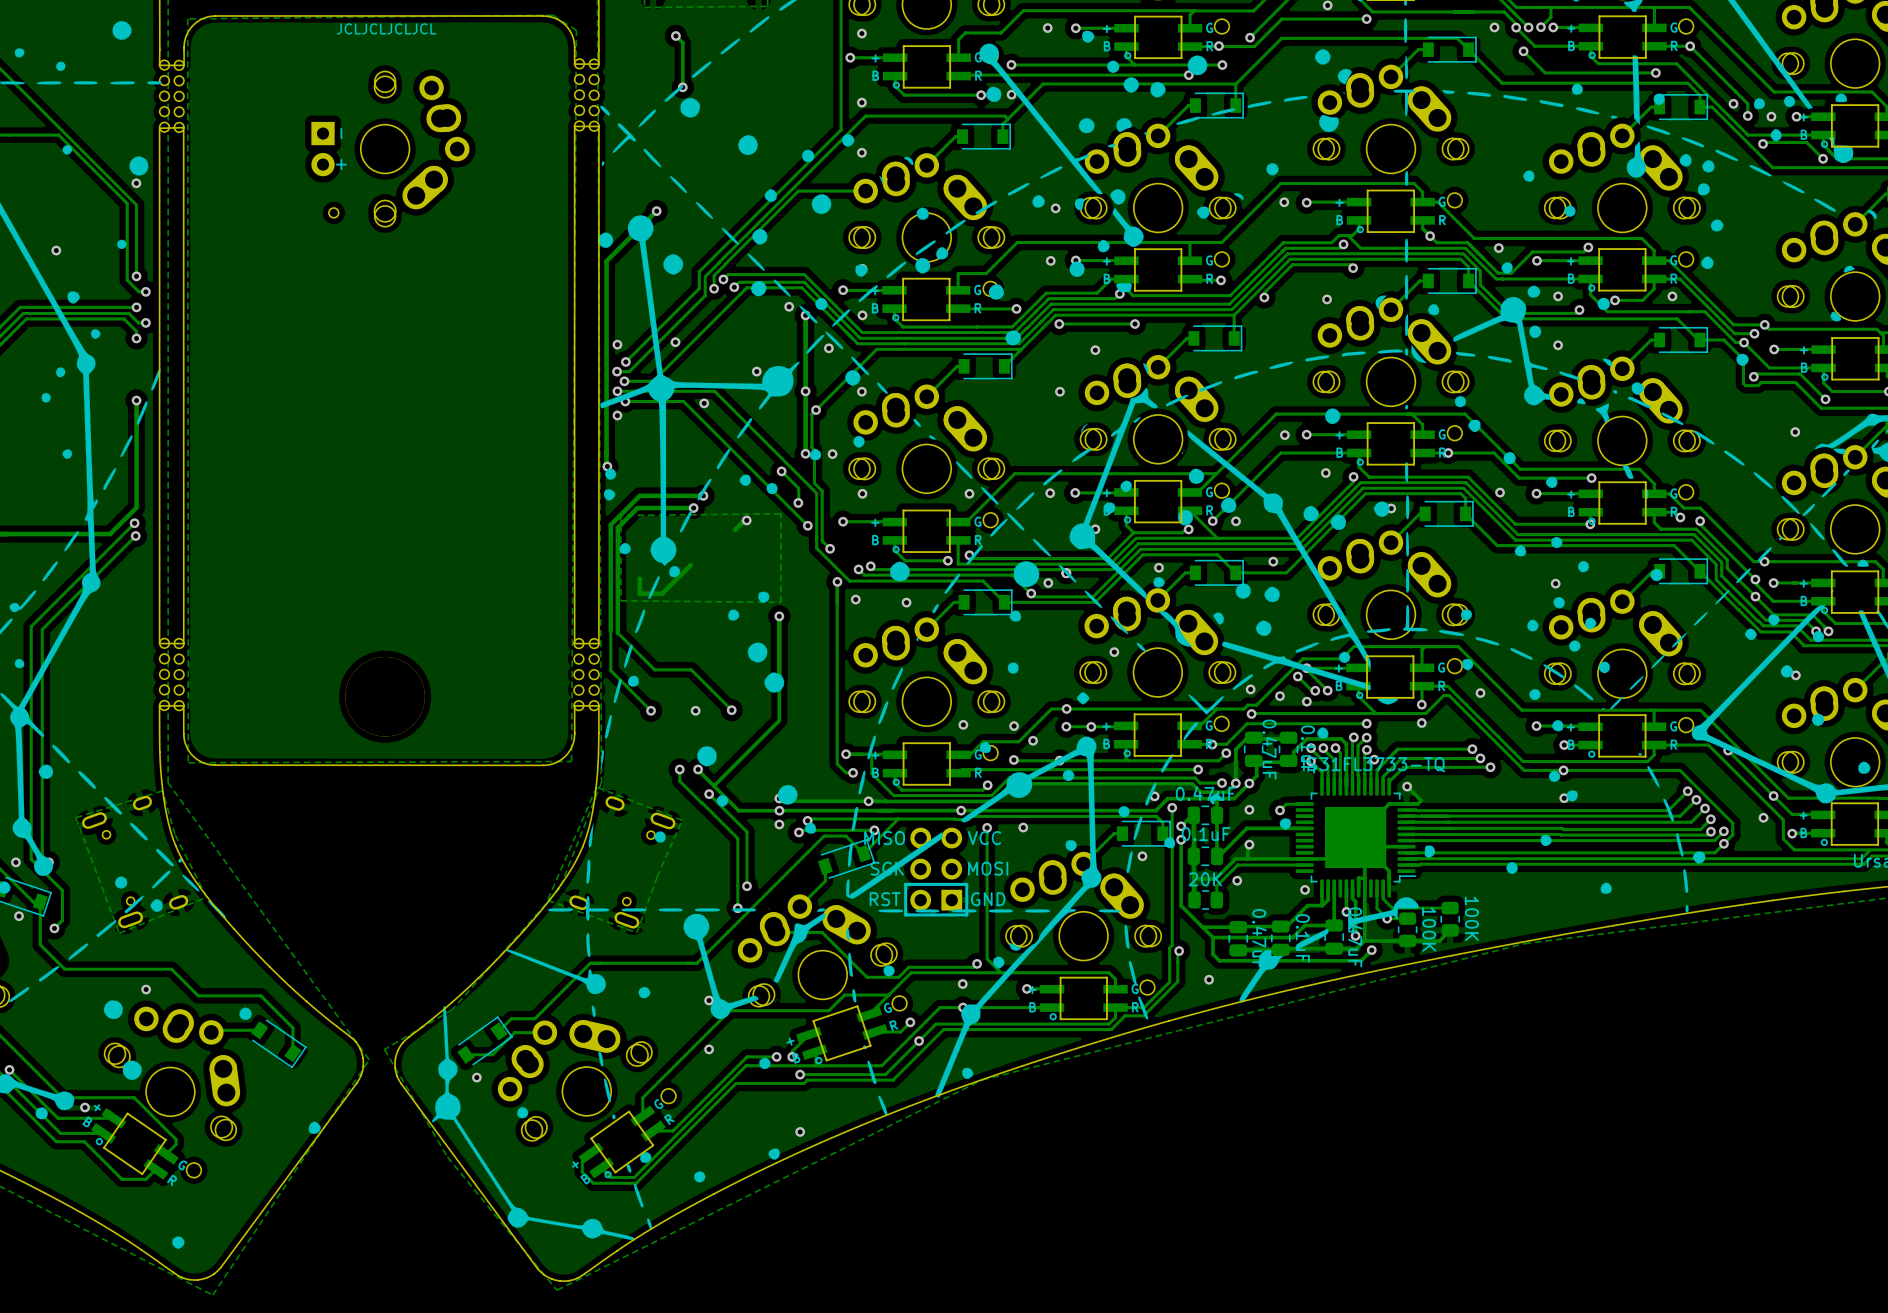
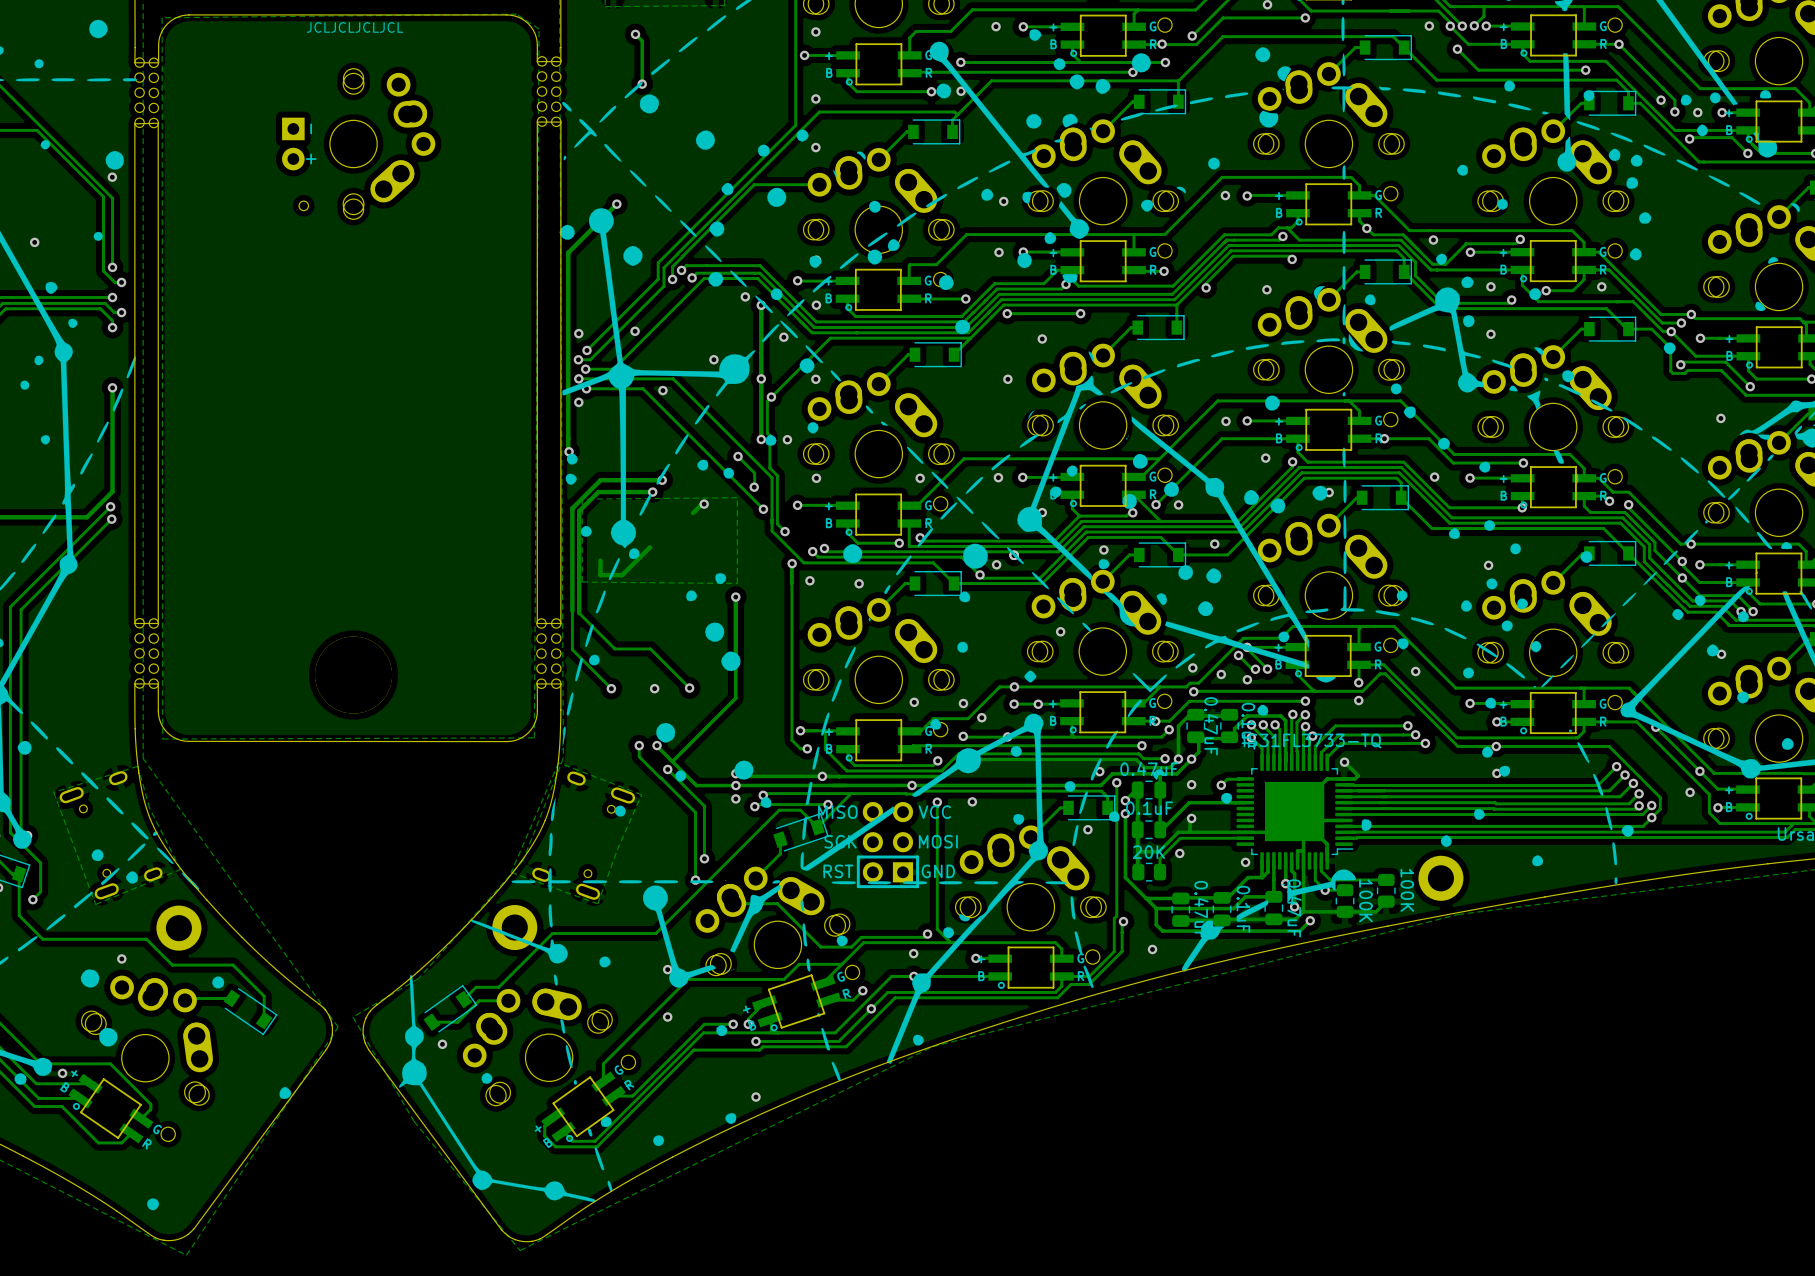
part: none -> (1440, 878)
part: none -> (178, 928)
part: none -> (514, 927)

